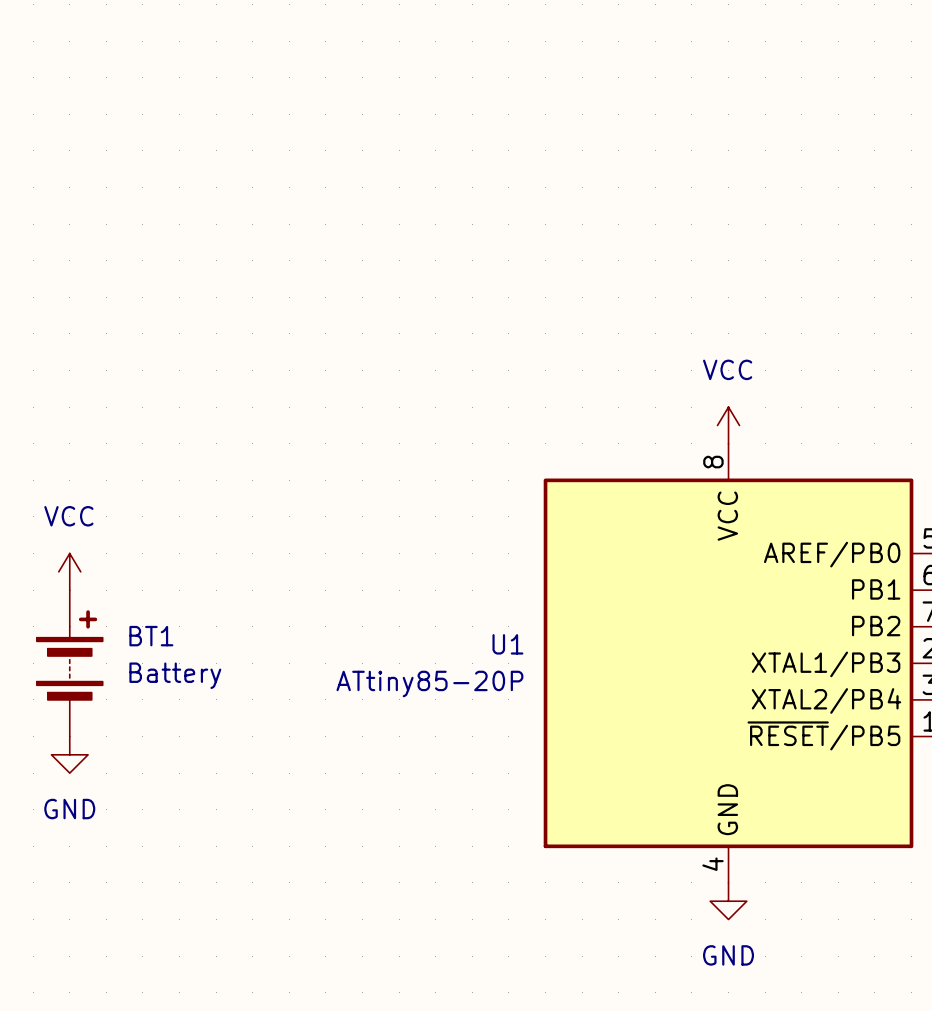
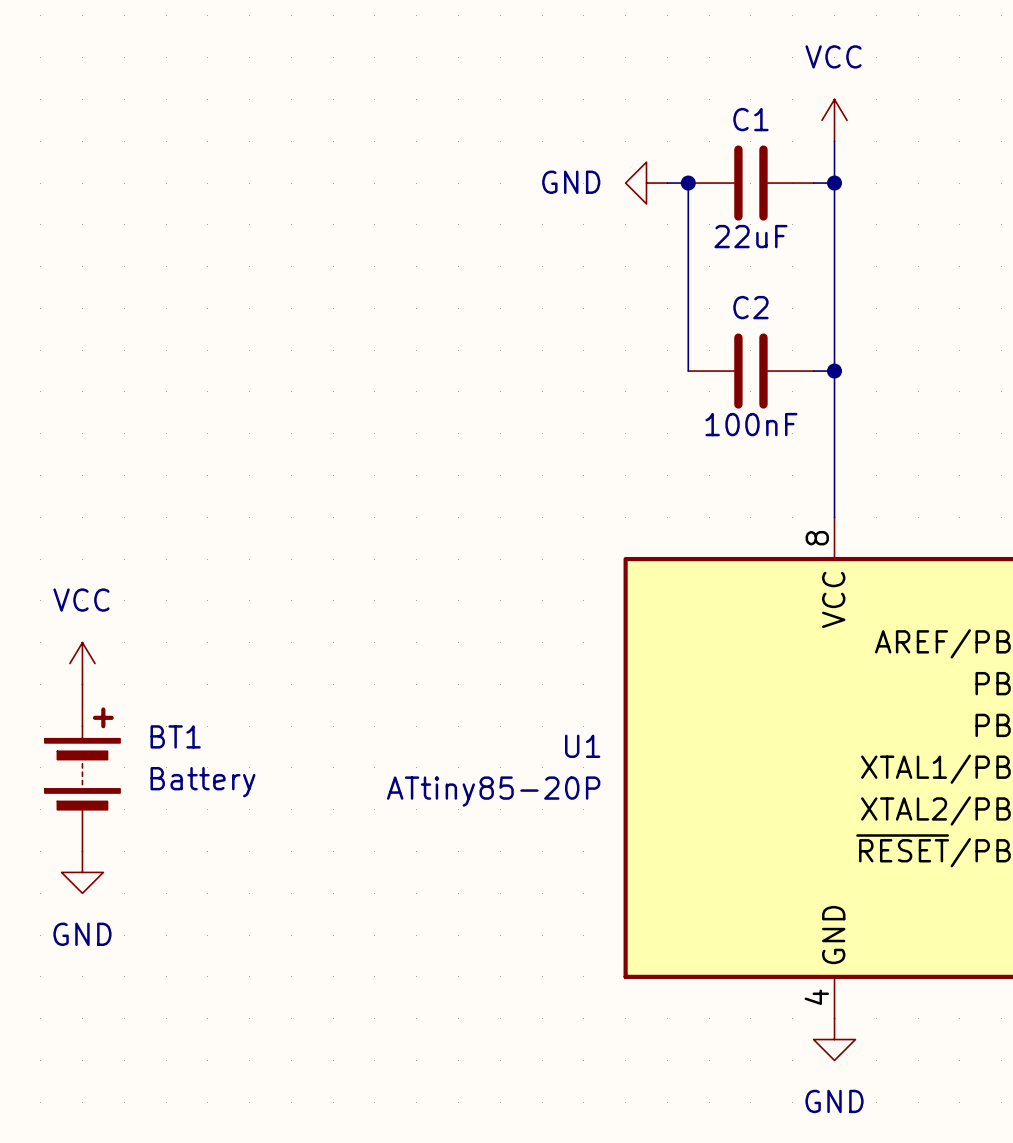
wire: none -> (834, 141) (834, 517)
power symbol: none -> GND (646, 183)
wire: none -> (667, 183) (688, 183) (688, 371)
junction: none -> (688, 183)
C1: none -> 22uF (750, 183)
wire: none -> (813, 183) (834, 183)
junction: none -> (834, 183)
C2: none -> 100nF (750, 371)
wire: none -> (813, 371) (834, 371)
junction: none -> (834, 371)
power symbol position: VCC (728, 425) -> VCC (834, 120)

